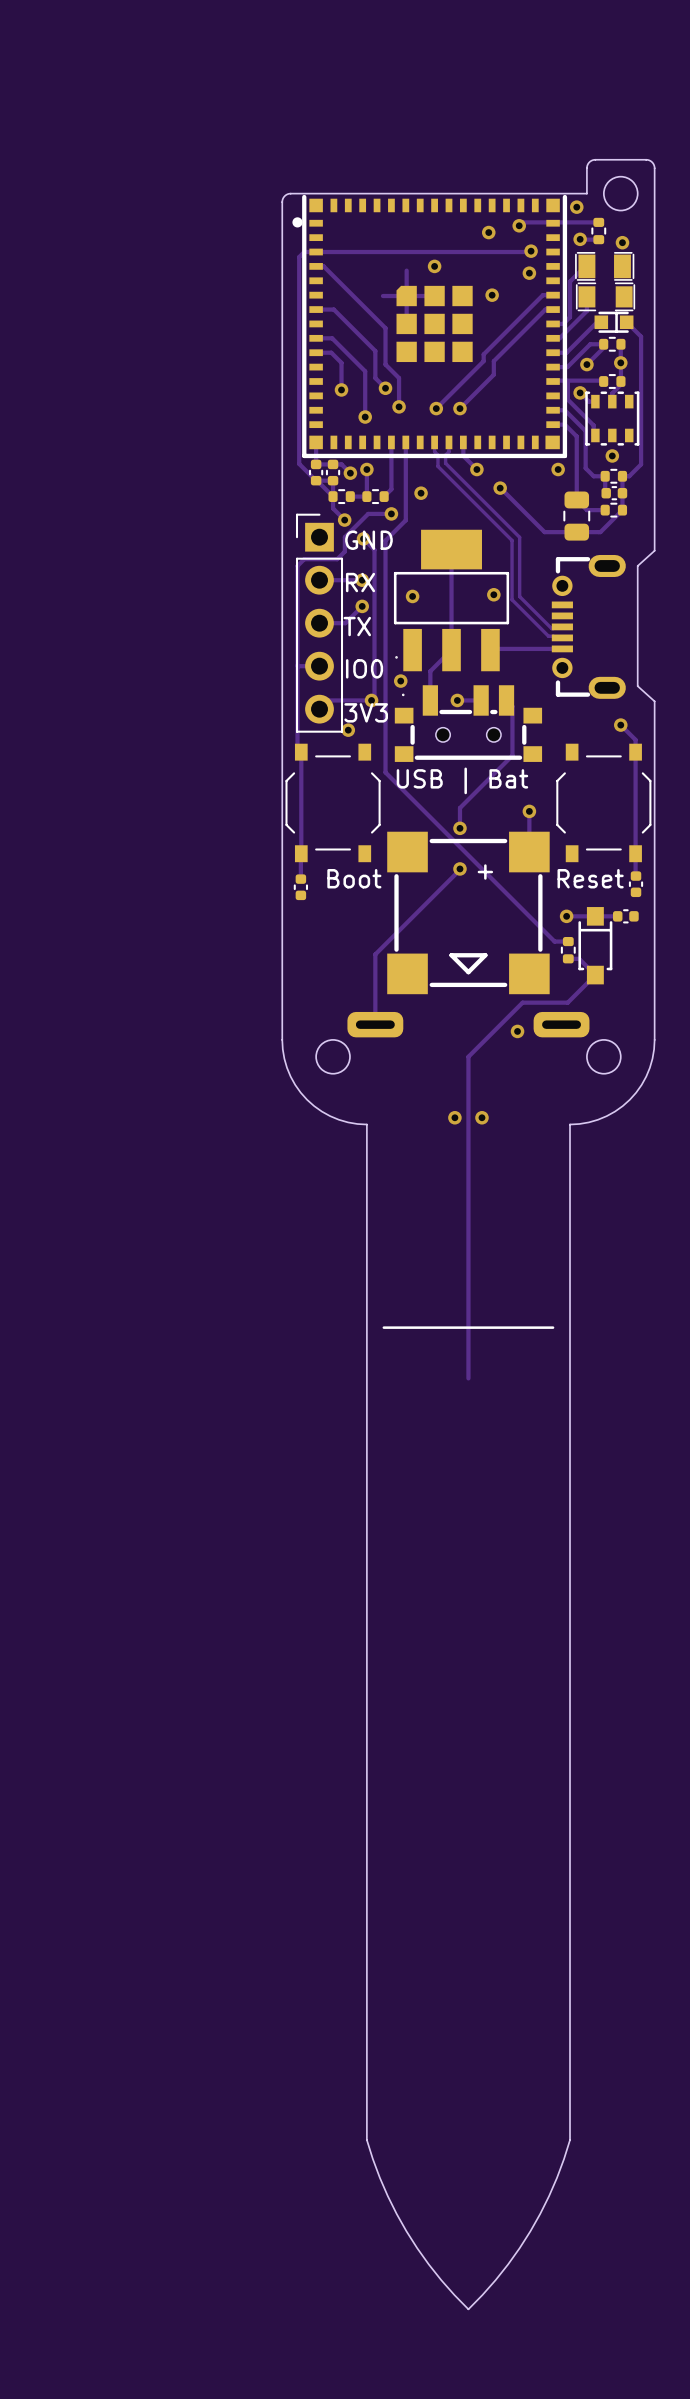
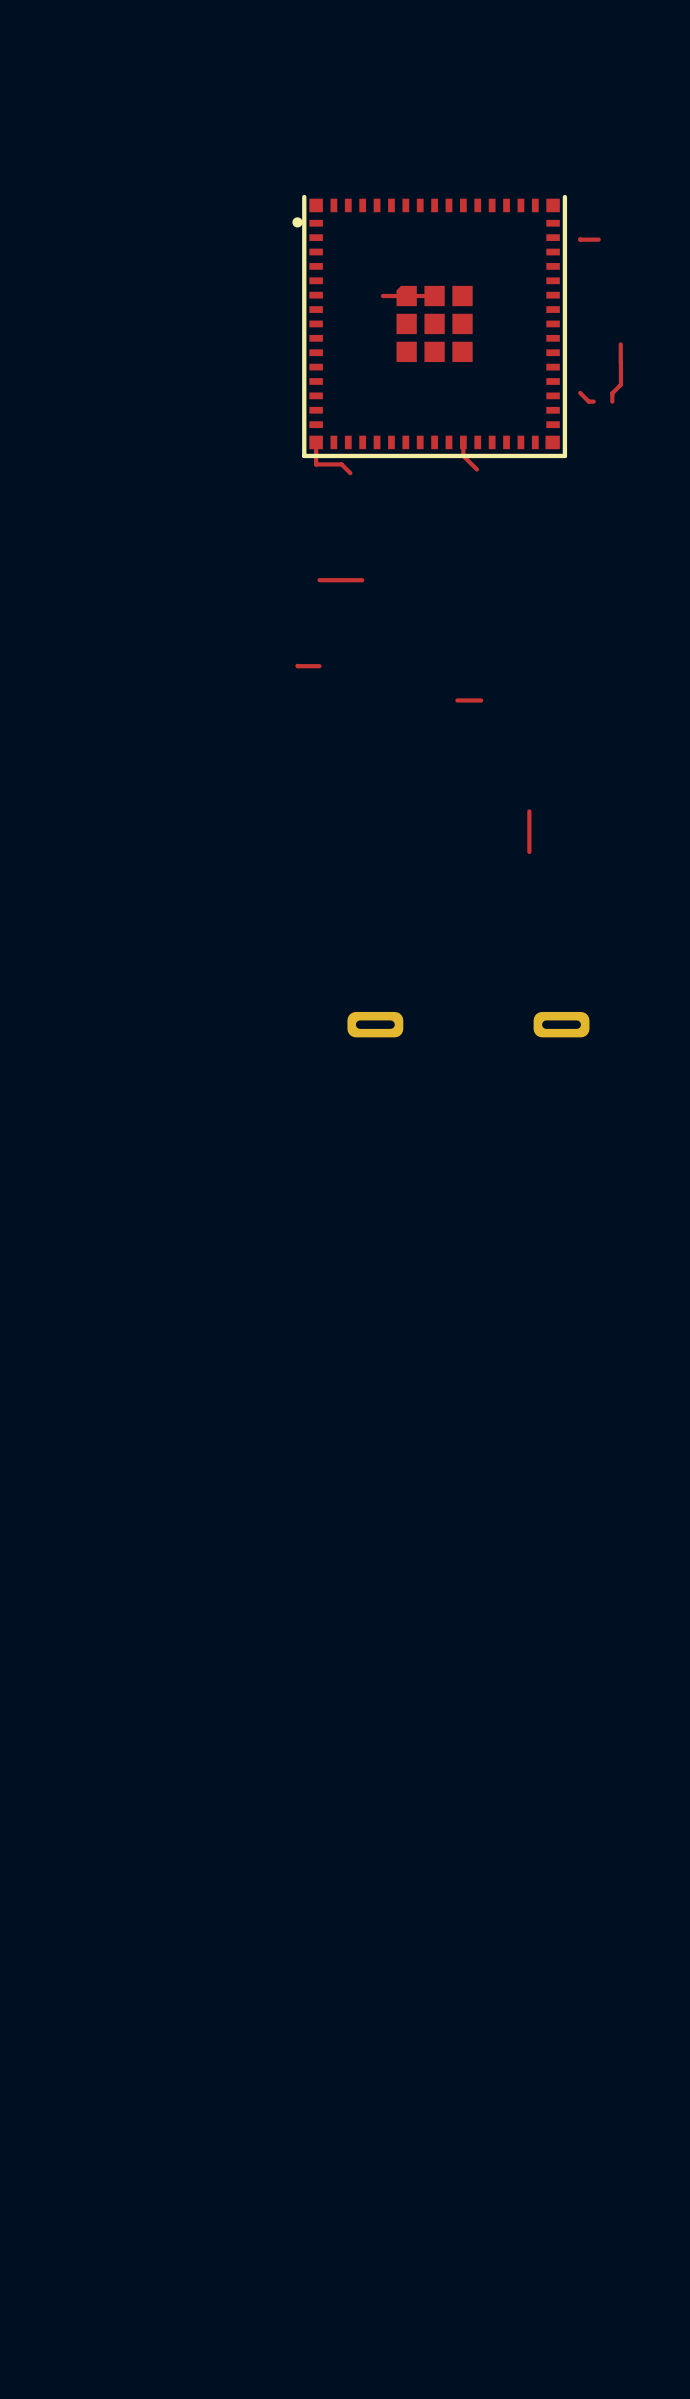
board edge: (595, 159) (647, 159) (652, 162) (654, 167) (654, 550) (637, 565) (637, 686) (654, 701) (654, 1049) (646, 1076) (636, 1092) (622, 1106) (597, 1119) (570, 1124) (570, 2140) (549, 2196) (530, 2231) (508, 2264) (468, 2309) (441, 2280) (406, 2231) (379, 2177) (366, 2140) (366, 1124) (338, 1119) (314, 1106) (300, 1092) (290, 1076) (282, 1049) (282, 202) (284, 196) (290, 193) (586, 193) (587, 166) (590, 161) (595, 159) -> none
round board edge: [603, 175, 639, 212] -> none
via: (576, 207) -> none
track: (598, 222) (522, 222) (519, 225) -> none
via: (519, 225) -> none
part: (598, 231) -> none
via: (488, 232) -> none
via: (580, 239) -> none
via: (622, 242) -> none
track: (531, 251) (304, 252) (299, 257) (299, 463) (315, 480) (333, 480) (333, 508) (344, 520) -> none
via: (531, 251) -> none
track: (316, 266) (323, 266) (385, 328) (385, 364) (399, 378) (399, 406) -> none
via: (434, 266) -> none
track: (585, 266) (570, 281) (570, 317) (563, 323) (553, 323) -> none
part: (604, 266) -> none
track: (406, 270) (406, 323) -> none
via: (529, 273) -> none
via: (492, 295) -> none
track: (553, 295) (542, 295) (483, 354) (483, 361) (436, 408) -> none
track: (586, 296) (586, 311) (559, 338) (553, 338) -> none
part: (605, 296) -> none
track: (316, 309) (333, 309) (375, 351) (375, 378) (385, 388) -> none
track: (553, 309) (545, 309) (493, 361) (493, 374) (459, 408) -> none
track: (601, 322) (597, 322) (566, 352) (553, 352) -> none
part: (614, 322) -> none
track: (626, 322) (641, 336) (641, 464) (629, 476) (622, 476) (622, 510) (600, 532) (544, 532) (500, 488) -> none
track: (316, 338) (332, 338) (365, 371) (365, 417) -> none
part: (612, 344) -> none
track: (316, 352) (331, 352) (341, 362) (341, 389) -> none
via: (620, 362) -> none
track: (586, 364) (603, 347) (603, 344) (590, 344) (567, 367) (553, 367) -> none
via: (586, 364) -> none
track: (566, 380) (567, 399) (593, 425) (593, 435) -> none
track: (553, 381) (603, 381) -> none
part: (612, 381) -> none
via: (385, 388) -> none
via: (341, 389) -> none
via: (580, 392) -> none
via: (399, 406) -> none
via: (436, 408) -> none
via: (459, 408) -> none
track: (553, 410) (564, 410) (585, 431) (585, 468) (593, 476) (605, 476) (606, 493) -> none
via: (365, 417) -> none
part: (612, 418) -> none
track: (553, 424) (564, 424) (576, 436) (576, 499) (586, 510) (605, 510) -> none
track: (434, 441) (434, 451) (437, 455) (437, 466) (512, 540) (512, 599) (548, 636) (562, 637) -> none
track: (391, 442) (391, 489) (384, 496) -> none
track: (405, 442) (405, 520) (385, 540) (385, 772) (554, 941) (568, 941) -> none
track: (448, 442) (445, 463) (519, 537) (519, 596) (551, 628) (562, 626) -> none
via: (612, 455) -> none
track: (366, 469) (366, 496) (350, 496) -> none
via: (366, 469) -> none
via: (476, 469) -> none
via: (558, 469) -> none
part: (316, 472) -> none
part: (333, 472) -> none
via: (350, 473) -> none
part: (613, 476) -> none
track: (317, 480) (333, 496) -> none
via: (500, 488) -> none
via: (421, 493) -> none
part: (614, 493) -> none
part: (341, 496) -> none
part: (375, 496) -> none
part: (613, 510) -> none
track: (391, 513) (368, 513) (344, 537) (344, 551) (337, 559) (304, 559) (297, 565) (297, 748) (301, 752) (300, 879) -> none
via: (391, 513) -> none
part: (576, 516) -> none
via: (344, 520) -> none
track: (363, 538) (374, 549) (374, 697) (371, 700) (328, 700) (319, 709) -> none
via: (363, 538) -> none
text: GND (368, 540) -> none
track: (451, 549) (451, 650) (430, 671) (430, 700) -> none
via: (362, 580) -> none
text: RX (360, 582) -> none
via: (493, 594) -> none
via: (412, 596) -> none
part: (451, 600) -> none
track: (362, 606) (345, 623) (319, 623) -> none
via: (362, 606) -> none
part: (319, 623) -> none
text: TX (357, 626) -> none
part: (588, 626) -> none
track: (562, 648) (490, 650) -> none
text: IO0 (364, 668) -> none
via: (400, 681) -> none
via: (371, 700) -> none
via: (457, 700) -> none
track: (506, 700) (512, 706) (512, 755) (459, 808) (459, 828) -> none
text: 3V3 (366, 712) -> none
part: (468, 723) -> none
track: (620, 725) (635, 739) (636, 876) -> none
via: (620, 725) -> none
via: (348, 730) -> none
text: USB | Bat (462, 780) -> none
part: (333, 802) -> none
part: (603, 802) -> none
via: (529, 811) -> none
via: (459, 828) -> none
track: (459, 868) (375, 954) (375, 1031) -> none
via: (459, 868) -> none
text: Boot (354, 878) -> none
text: Reset (590, 878) -> none
part: (636, 884) -> none
part: (300, 887) -> none
part: (468, 912) -> none
track: (566, 916) (617, 916) -> none
via: (566, 916) -> none
part: (625, 916) -> none
part: (595, 945) -> none
part: (568, 950) -> none
track: (568, 958) (579, 958) (595, 975) (567, 1002) (522, 1002) (468, 1056) (468, 1378) -> none
via: (517, 1031) -> none
round board edge: [315, 1039, 351, 1075] -> none
round board edge: [586, 1039, 622, 1075] -> none
via: (454, 1117) -> none
via: (481, 1117) -> none
line: (383, 1327) (553, 1327) -> none

